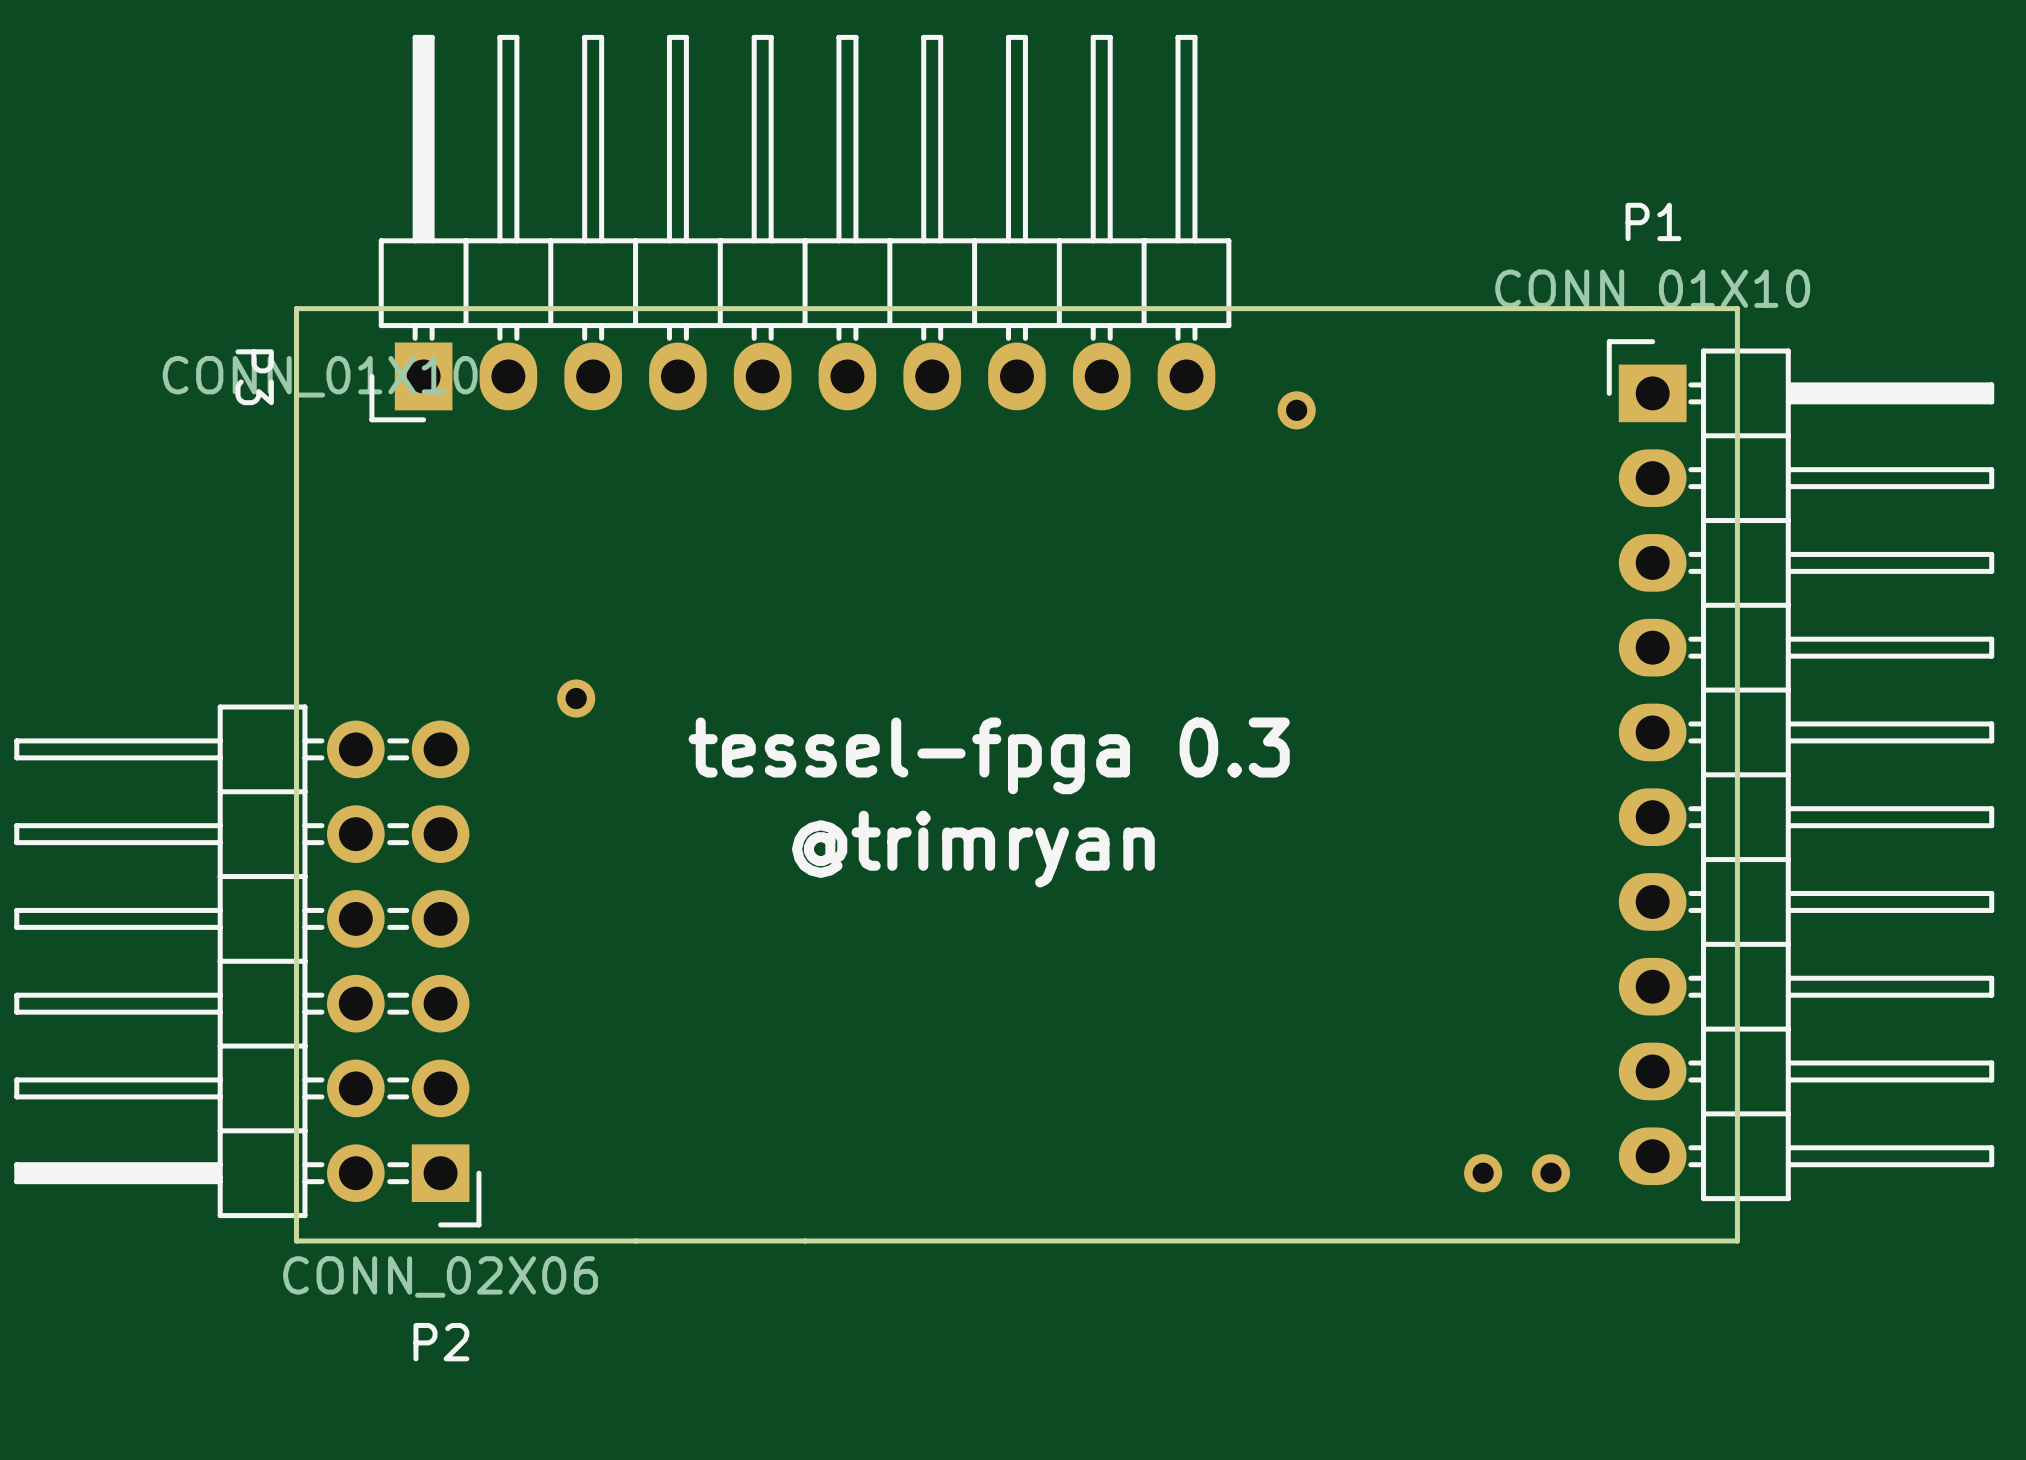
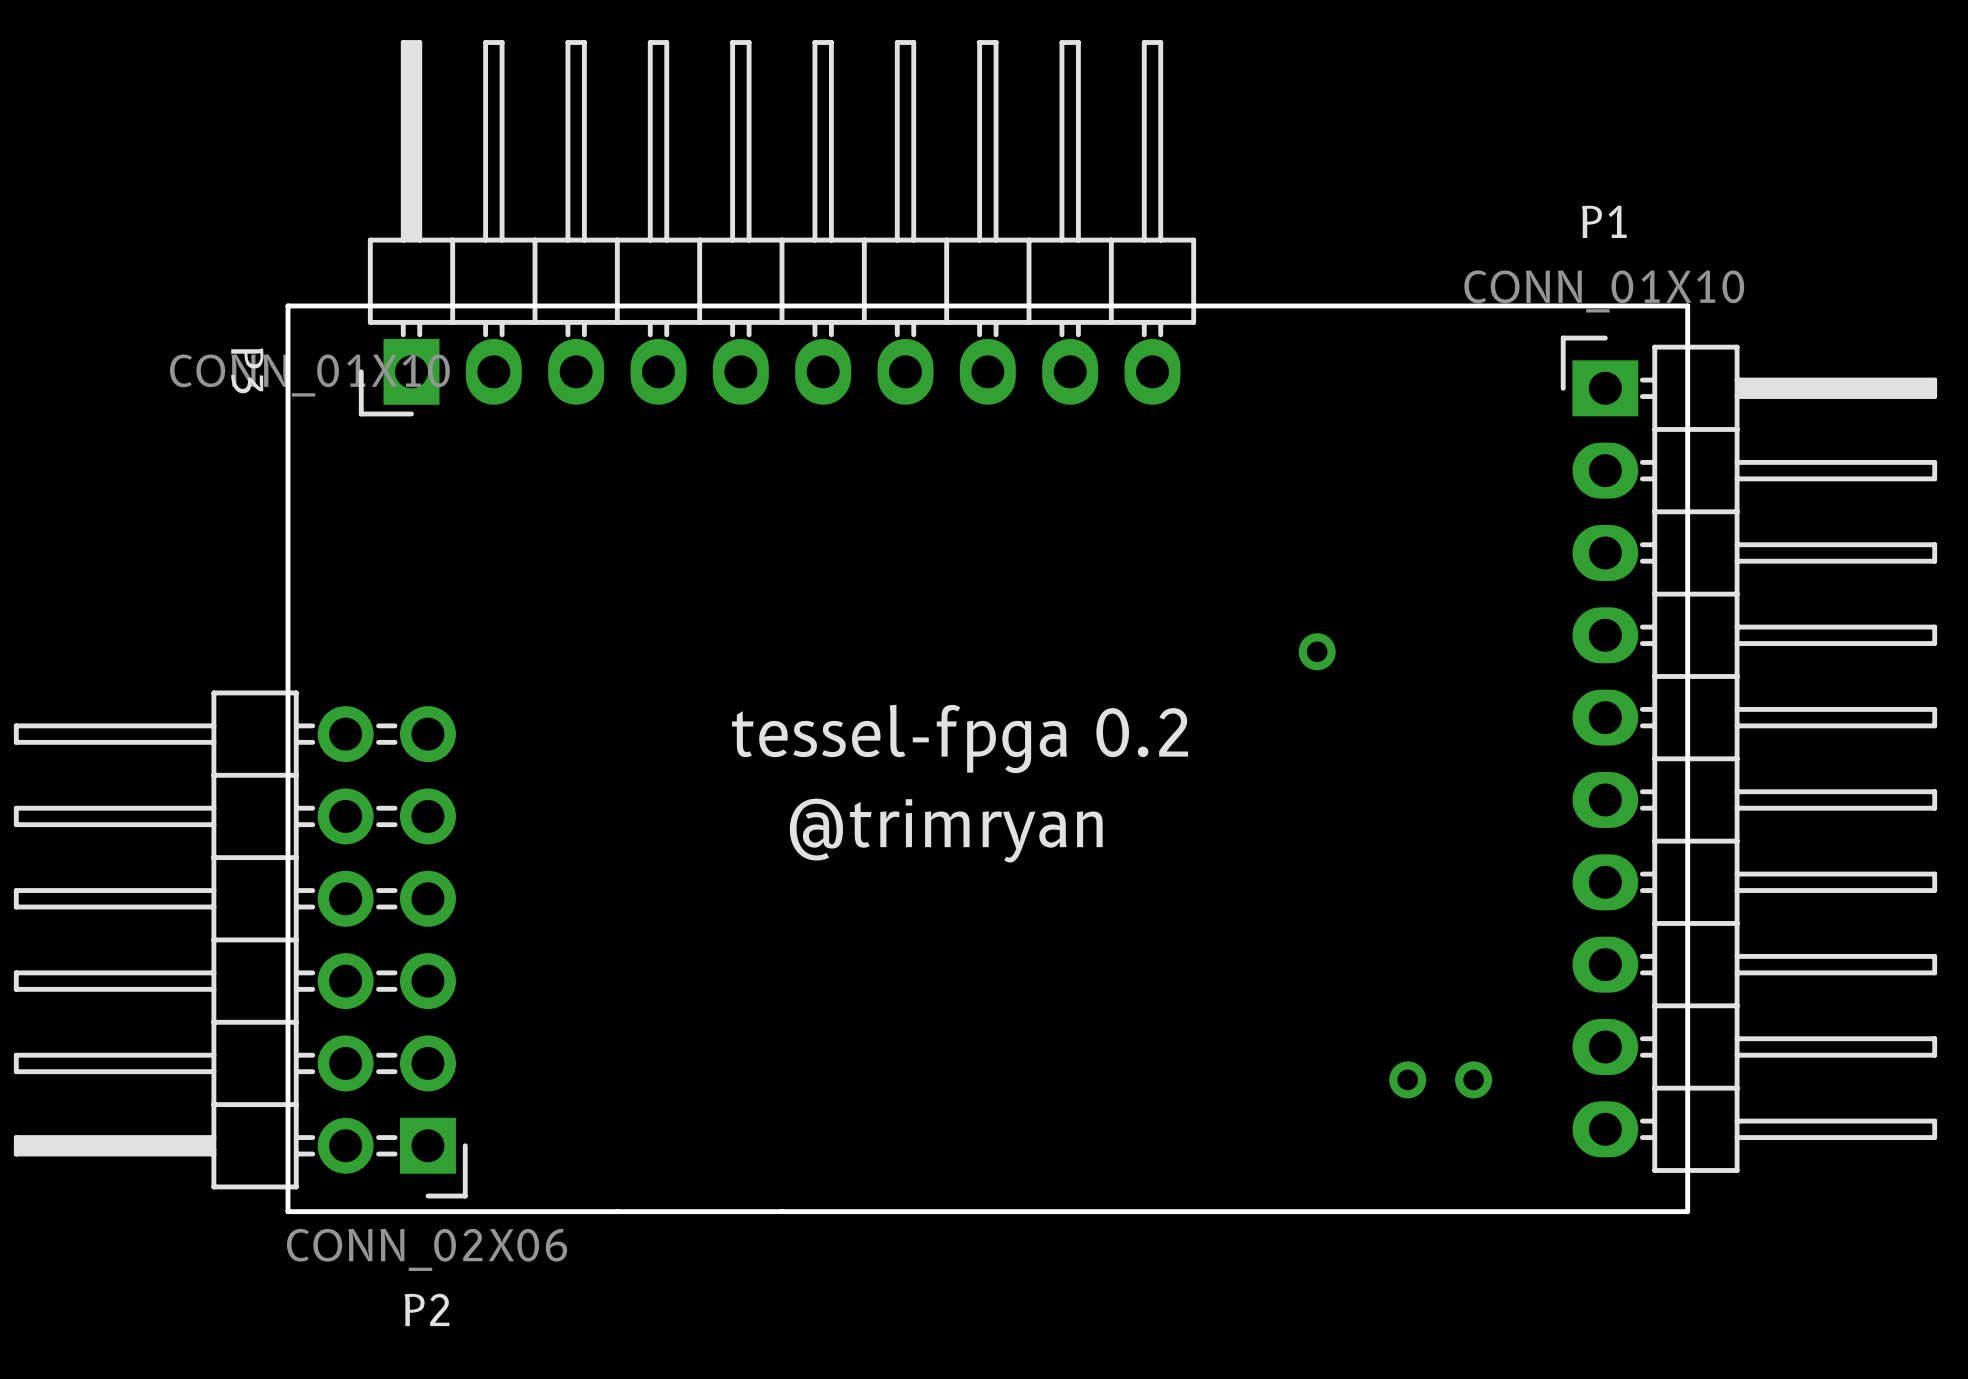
part position: (1296, 410) -> (1317, 651)
part: (576, 698) -> none
text: tessel-fpga 0.3 (989, 755) -> tessel-fpga 0.2 (960, 738)
part: none -> (1407, 1079)
part: none -> (1473, 1079)
part: (1483, 1173) -> none
part: (1550, 1173) -> none

